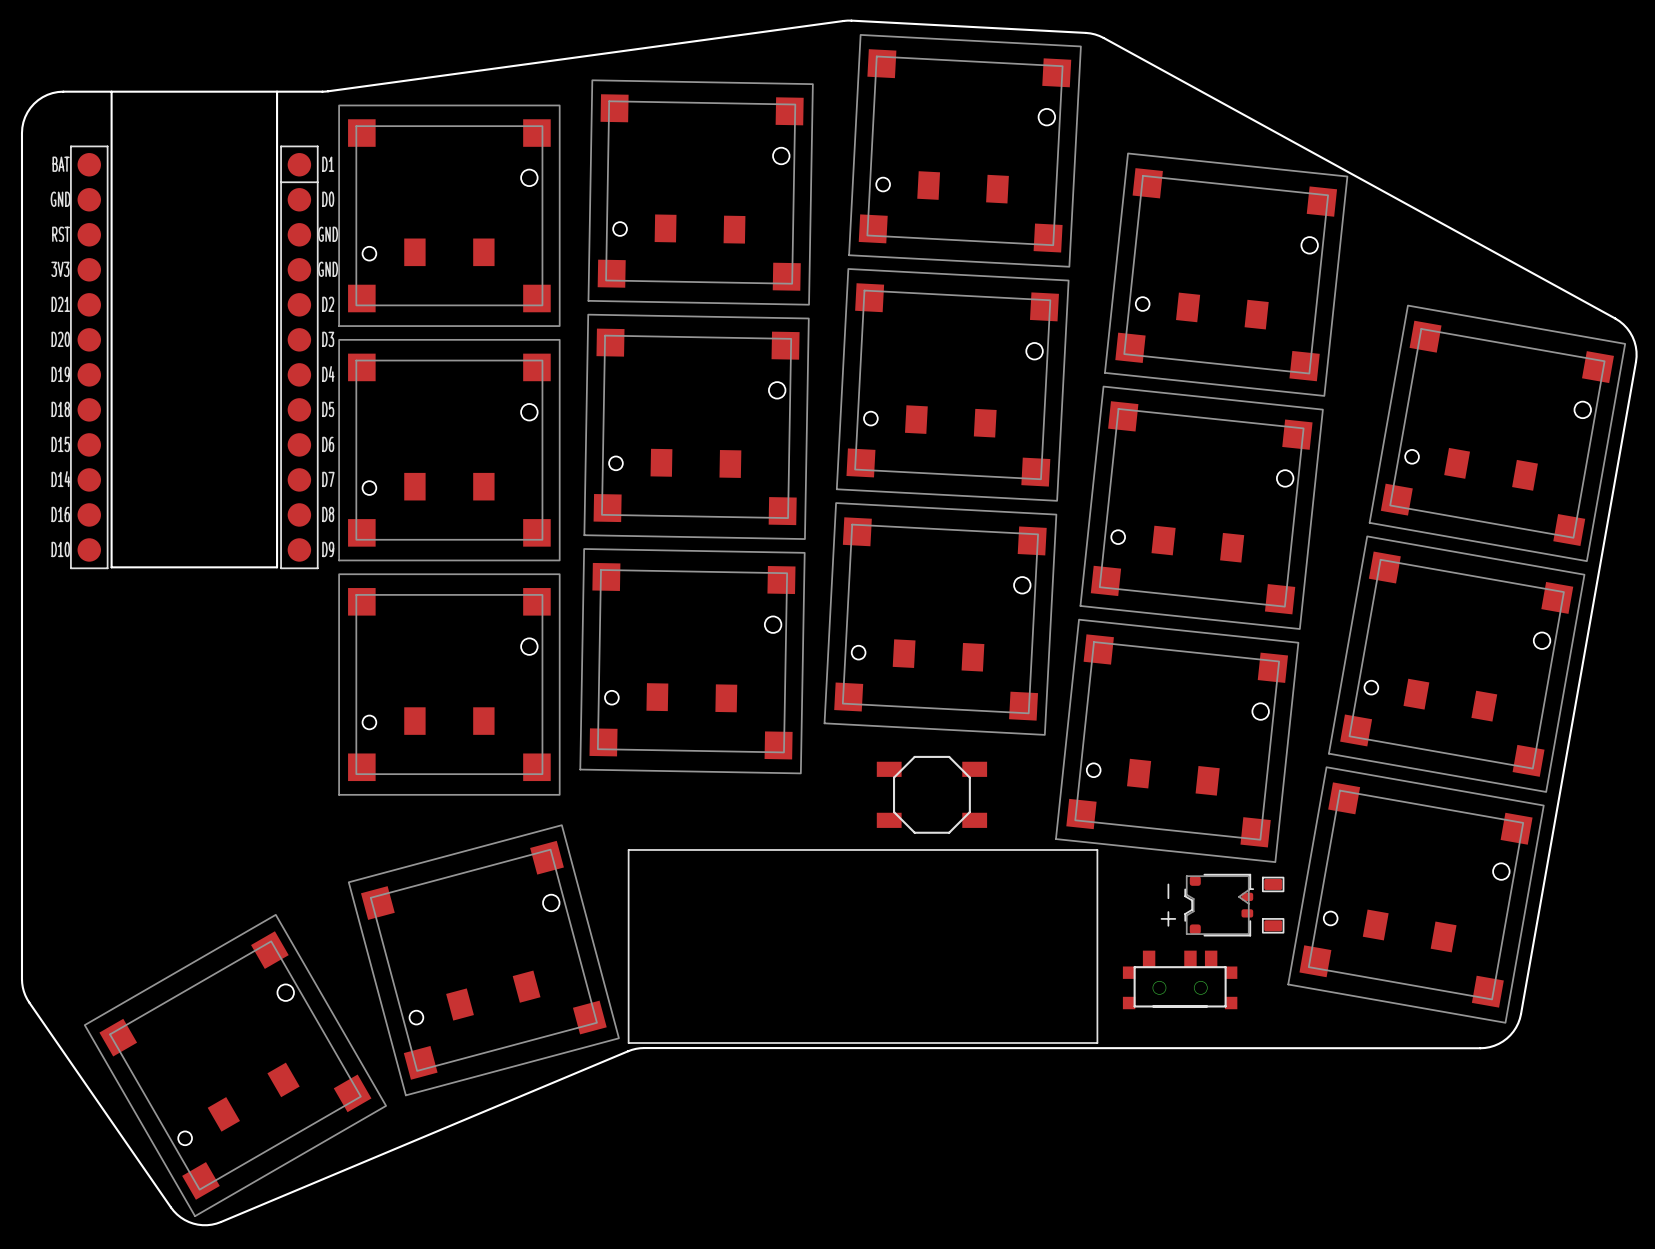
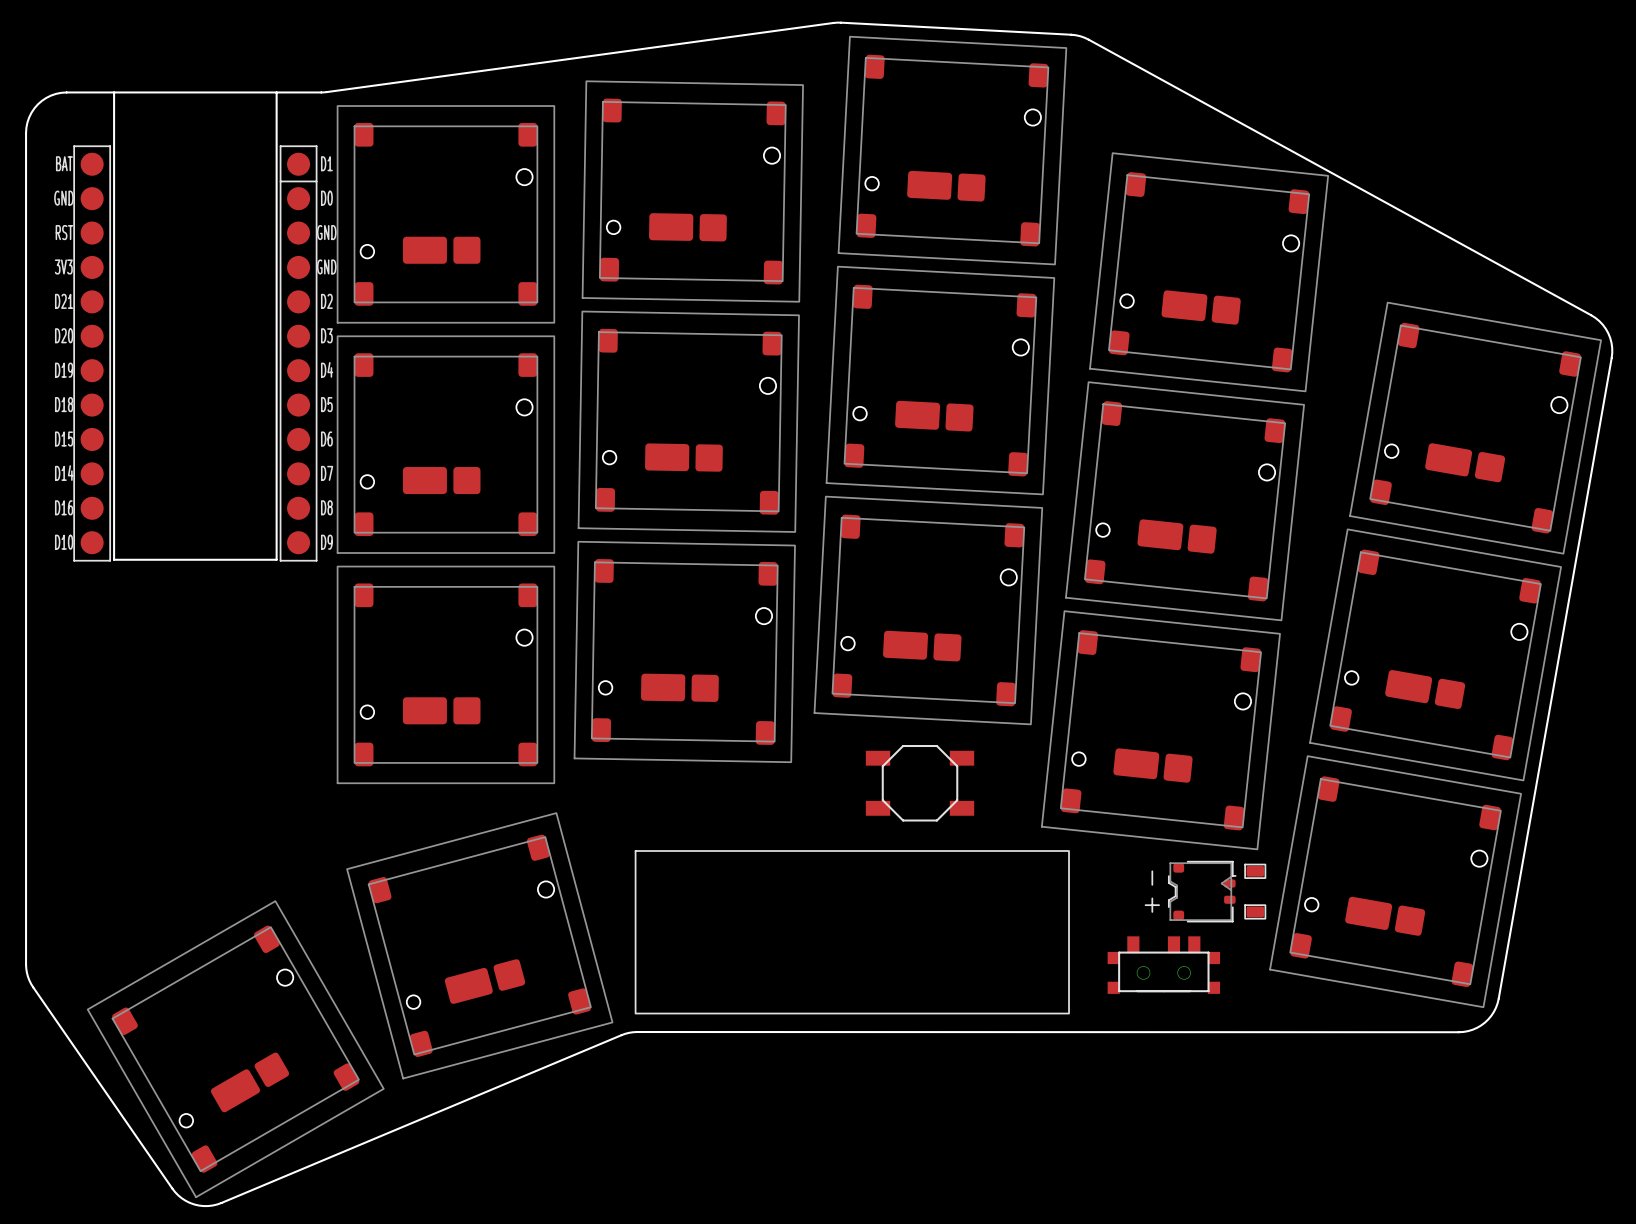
part footprint: [848, 34, 1082, 268] -> [837, 36, 1068, 266]
part footprint: [587, 79, 814, 306] -> [581, 80, 804, 303]
part footprint: [338, 104, 561, 327] -> [336, 105, 555, 324]
part footprint: [1104, 152, 1349, 397] -> [1089, 152, 1329, 393]
part footprint: [836, 268, 1070, 502] -> [825, 265, 1055, 496]
part footprint: [1368, 304, 1626, 562] -> [1349, 301, 1602, 555]
part footprint: [583, 313, 810, 540] -> [577, 310, 800, 533]
part footprint: [338, 339, 561, 562] -> [336, 335, 555, 554]
part footprint: [1079, 385, 1324, 630] -> [1065, 381, 1305, 622]
part footprint: [823, 502, 1058, 736] -> [813, 495, 1043, 726]
part footprint: [1328, 535, 1586, 793] -> [1309, 528, 1562, 782]
part footprint: [579, 548, 806, 775] -> [573, 541, 796, 763]
part footprint: [338, 573, 561, 796] -> [336, 565, 555, 784]
part footprint: [1055, 618, 1300, 863] -> [1041, 610, 1281, 851]
part footprint: [1287, 766, 1545, 1024] -> [1269, 755, 1522, 1008]
part footprint: [348, 824, 620, 1097] -> [346, 812, 614, 1080]
drawing shape: [627, 849, 1099, 1044] -> [634, 850, 1070, 1015]
part footprint: [84, 914, 387, 1217] -> [87, 900, 385, 1198]

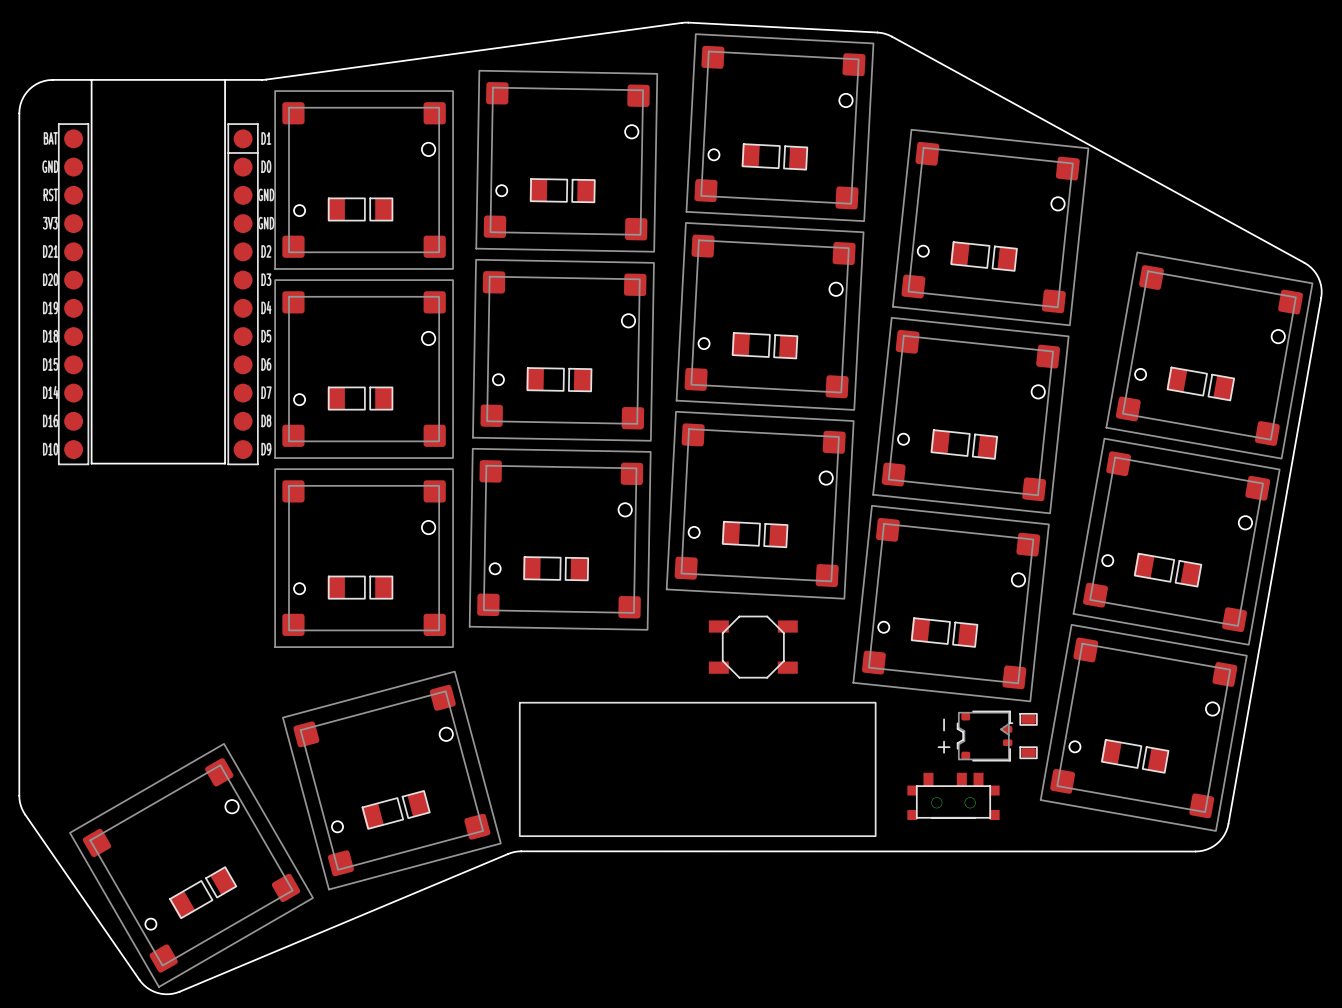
part footprint: [837, 36, 1068, 266] -> [685, 33, 875, 222]
part footprint: [581, 80, 804, 303] -> [475, 70, 658, 253]
part footprint: [336, 105, 555, 324] -> [274, 90, 454, 270]
part footprint: [1089, 152, 1329, 393] -> [892, 129, 1089, 326]
part footprint: [825, 265, 1055, 496] -> [676, 222, 865, 411]
part footprint: [1349, 301, 1602, 555] -> [1105, 251, 1314, 460]
part footprint: [577, 310, 800, 533] -> [472, 259, 655, 442]
part footprint: [336, 335, 555, 554] -> [274, 279, 454, 459]
part footprint: [1065, 381, 1305, 622] -> [872, 317, 1070, 514]
part footprint: [813, 495, 1043, 726] -> [666, 411, 855, 600]
part footprint: [1309, 528, 1562, 782] -> [1072, 438, 1281, 646]
part footprint: [573, 541, 796, 763] -> [469, 448, 652, 631]
part footprint: [336, 565, 555, 784] -> [274, 468, 454, 648]
part footprint: [1041, 610, 1281, 851] -> [852, 505, 1050, 702]
part footprint: [1269, 755, 1522, 1008] -> [1040, 624, 1248, 832]
part footprint: [346, 812, 614, 1080] -> [282, 671, 502, 891]
part footprint: [87, 900, 385, 1198] -> [69, 743, 314, 988]

